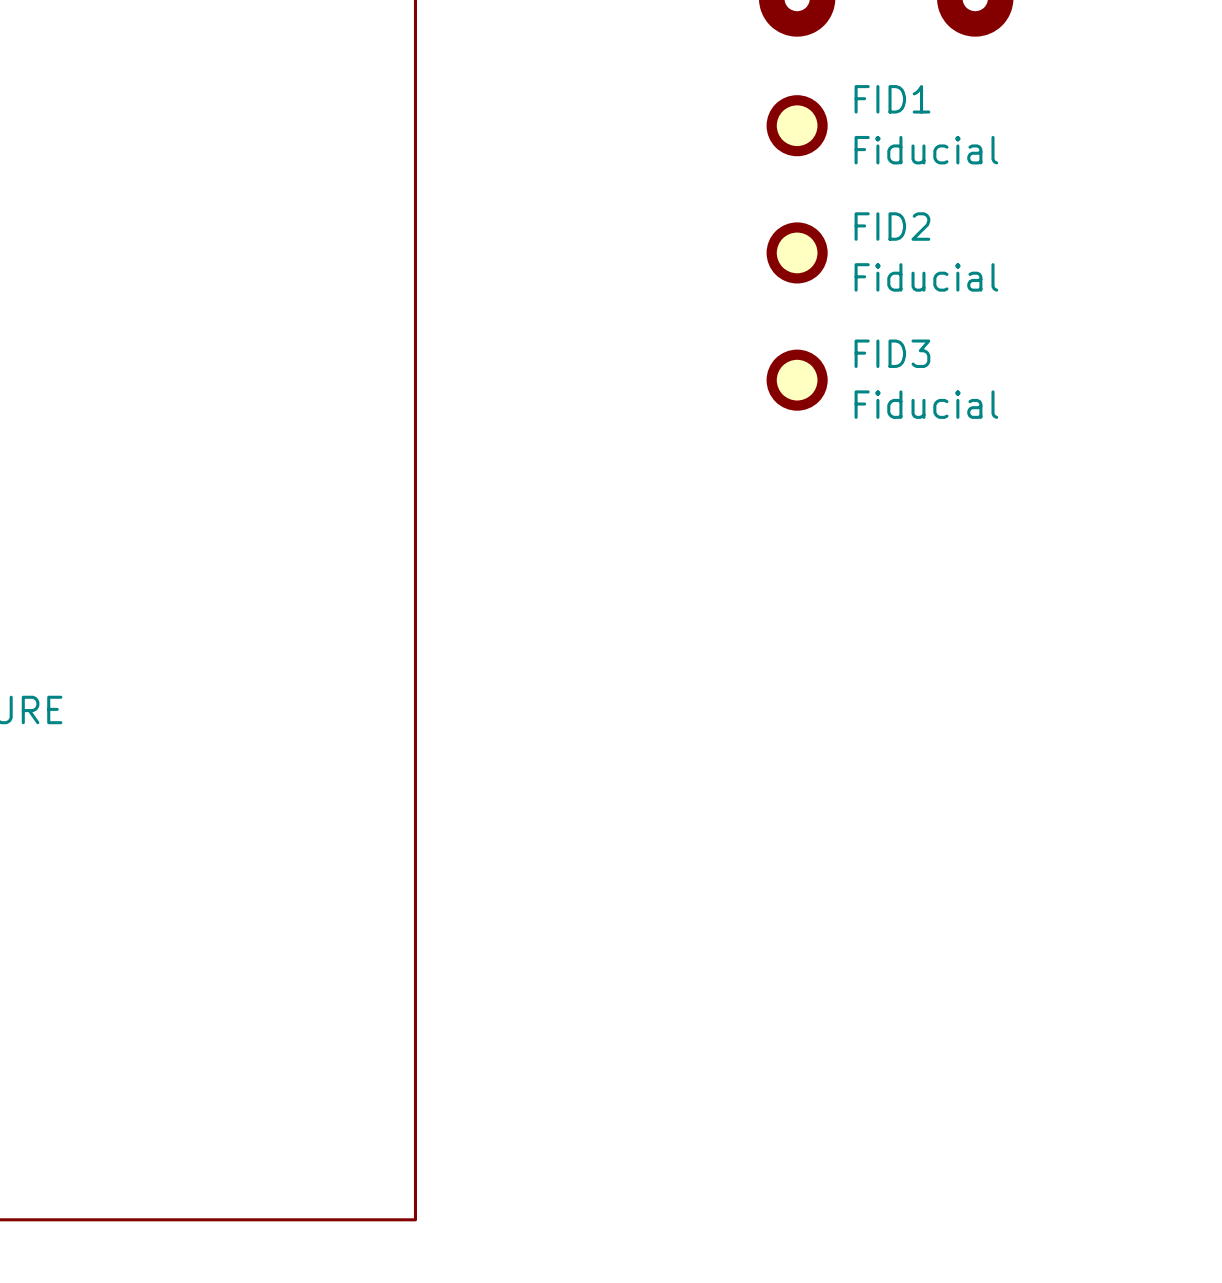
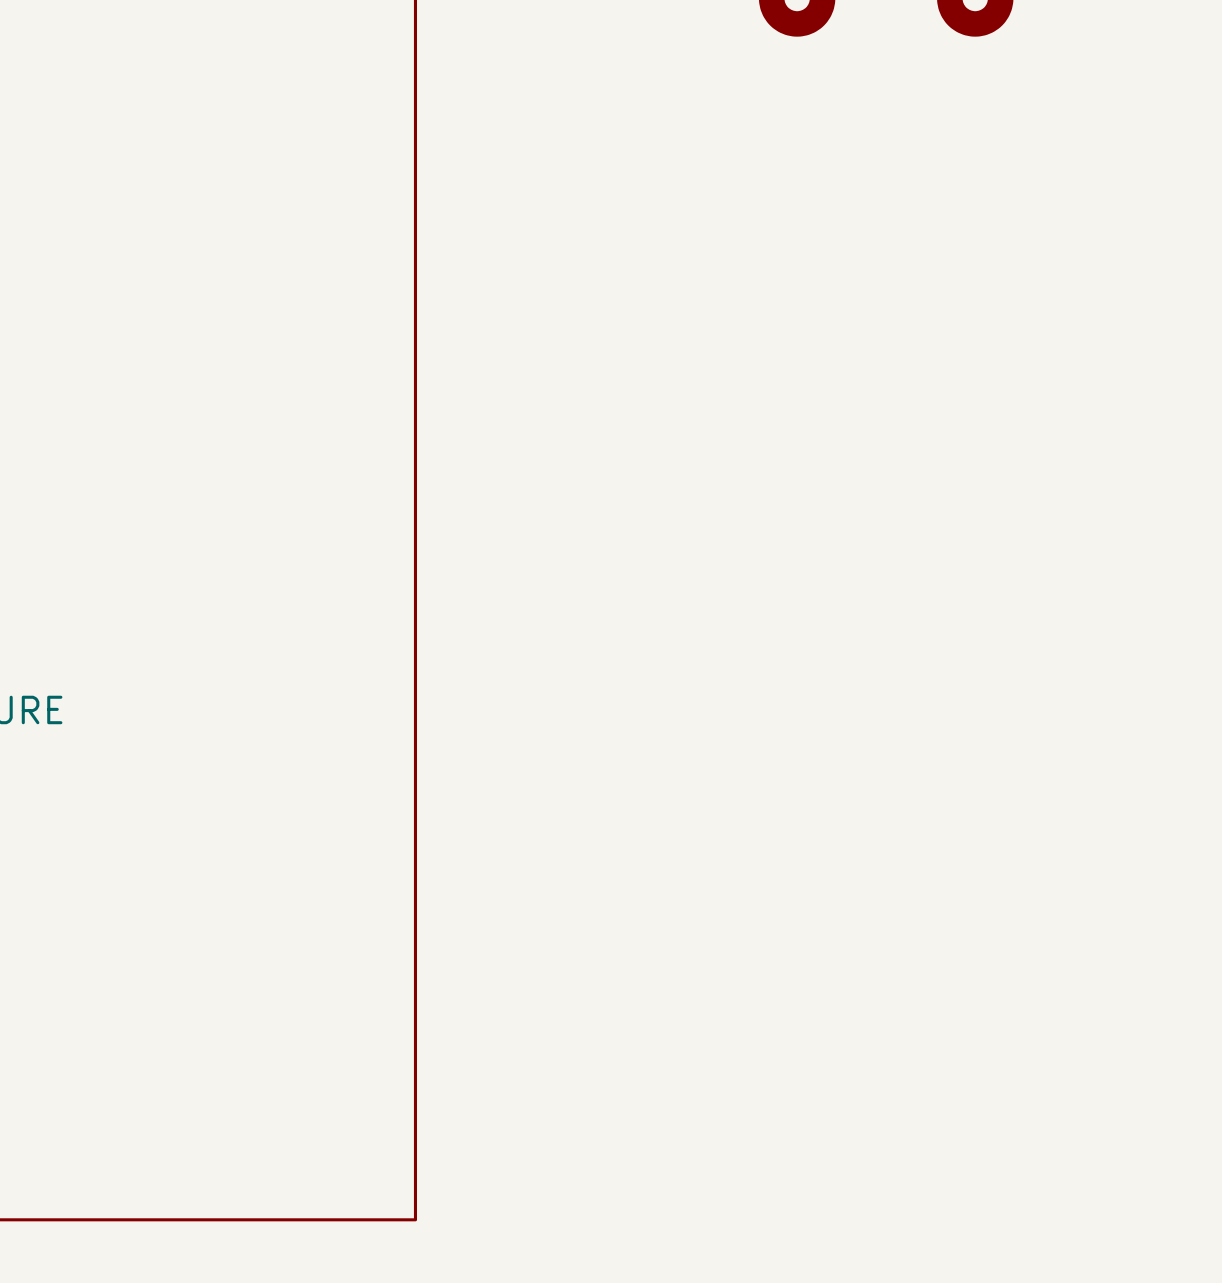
FID1: Fiducial (797, 125) -> none
FID2: Fiducial (797, 252) -> none
FID3: Fiducial (797, 380) -> none

